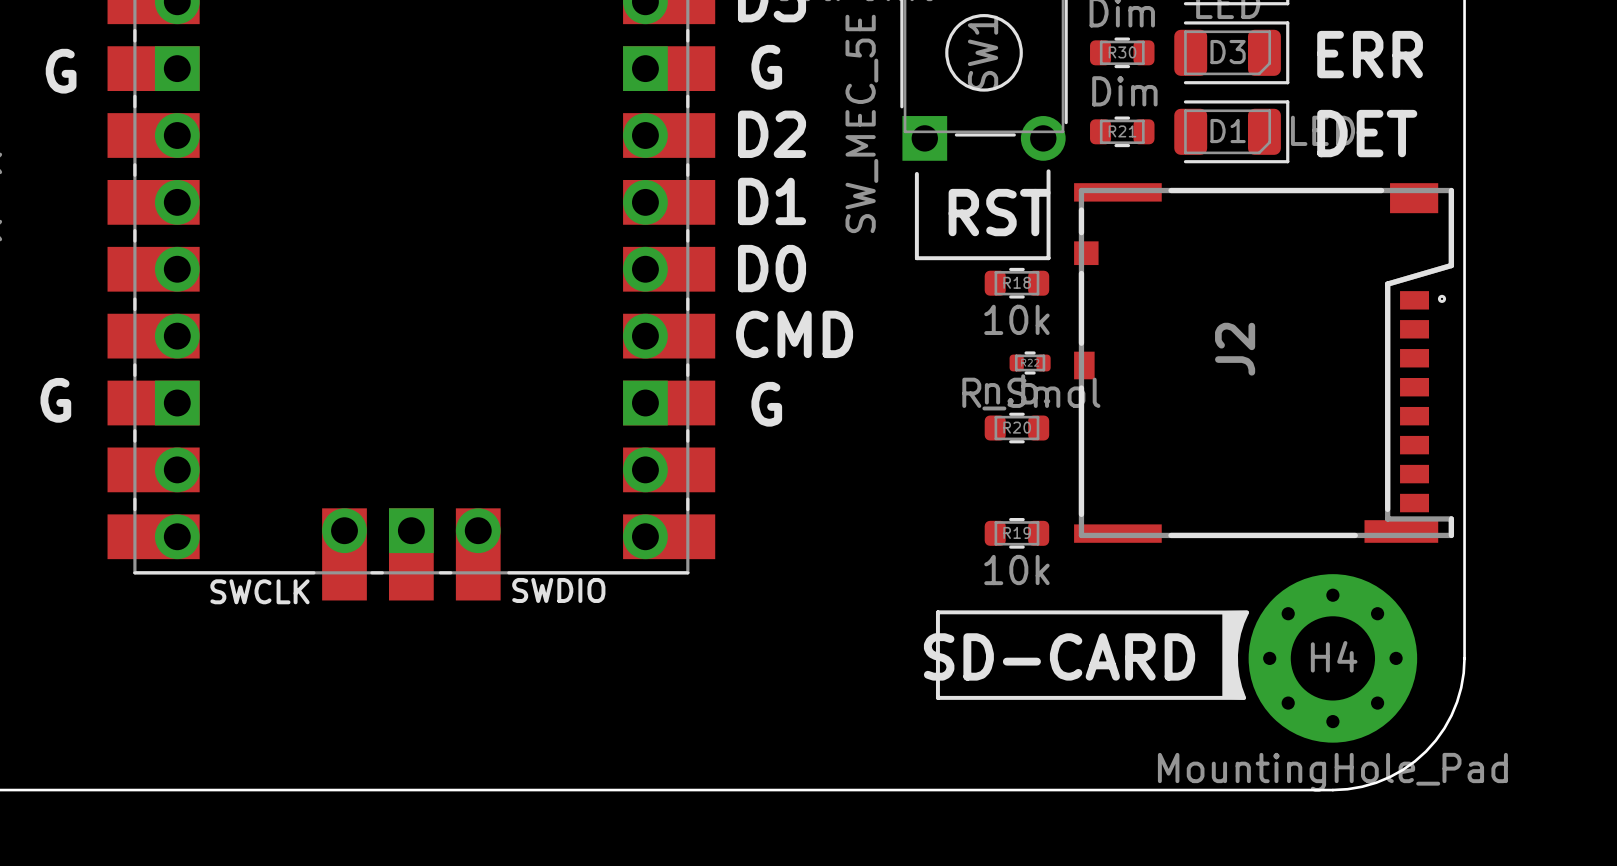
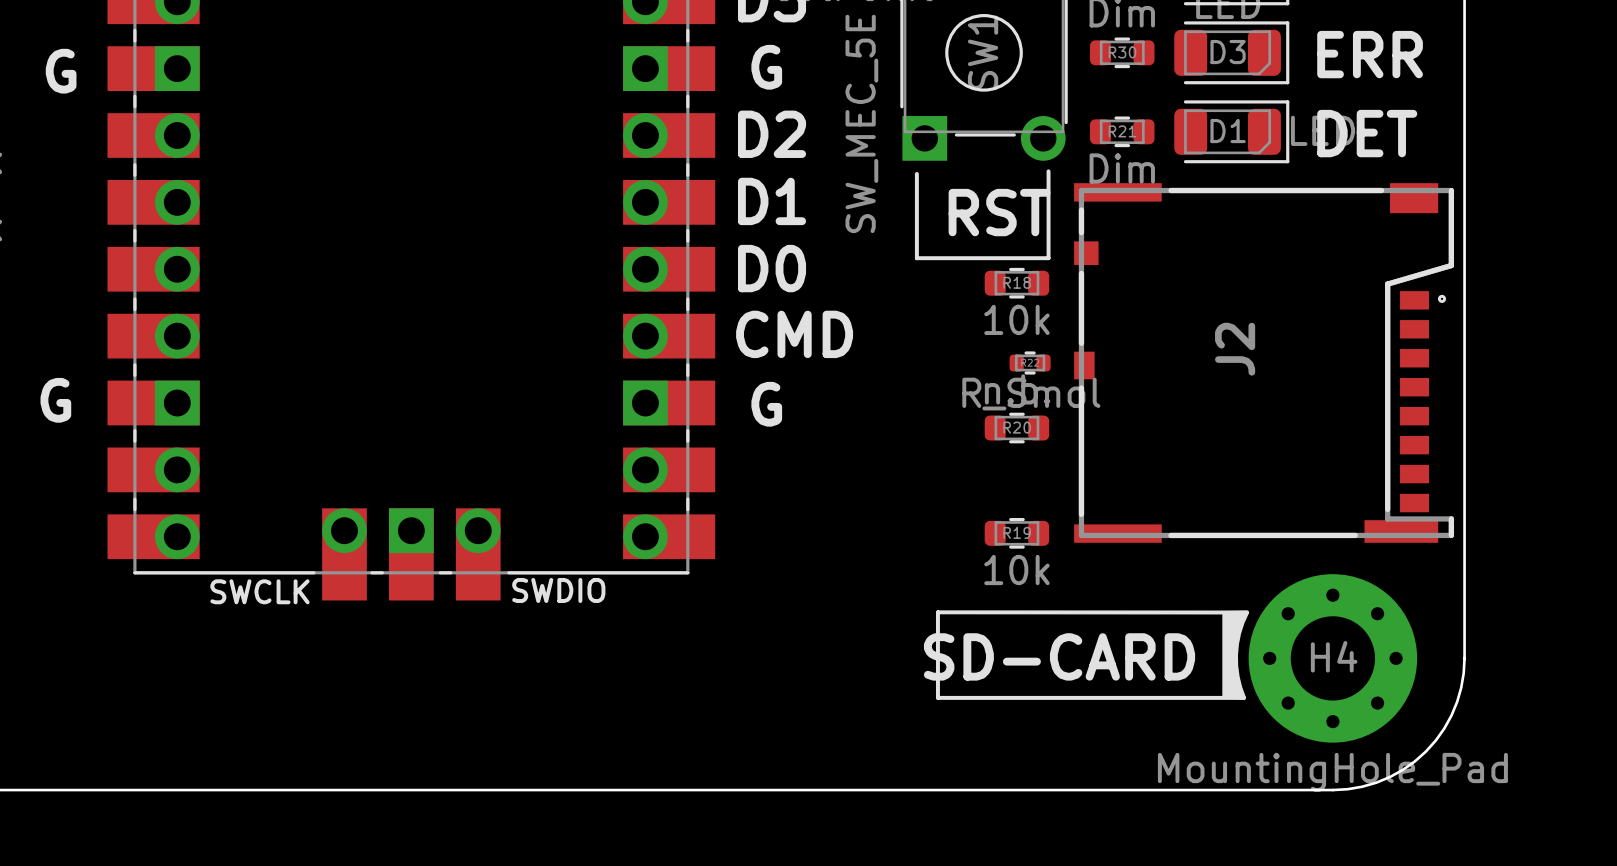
R21 value position: Dim (1124, 91) -> Dim (1122, 168)

